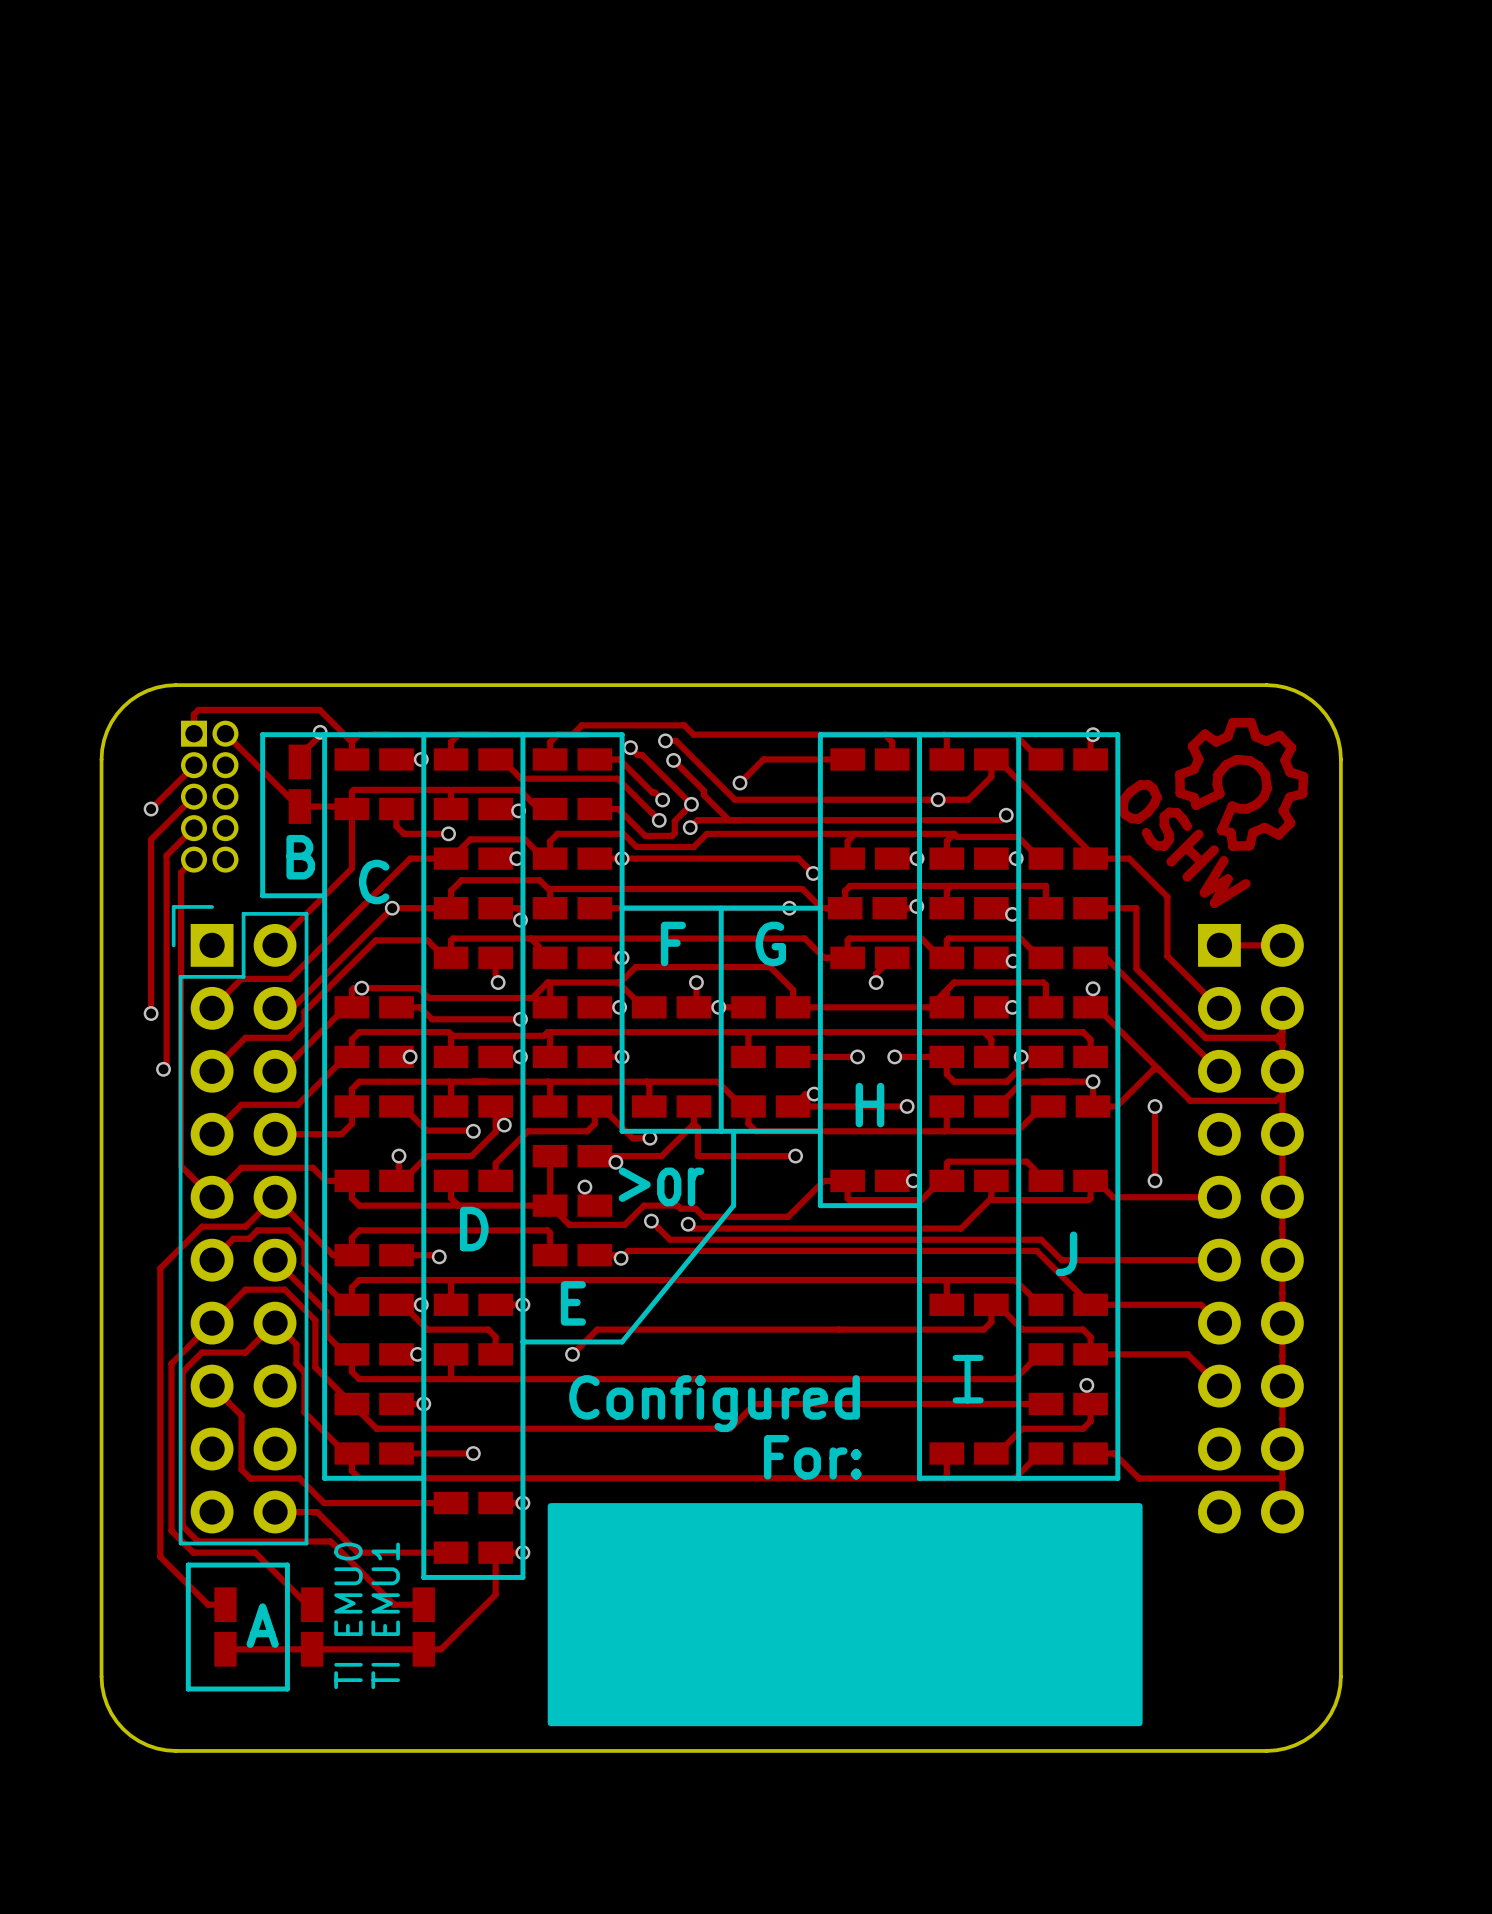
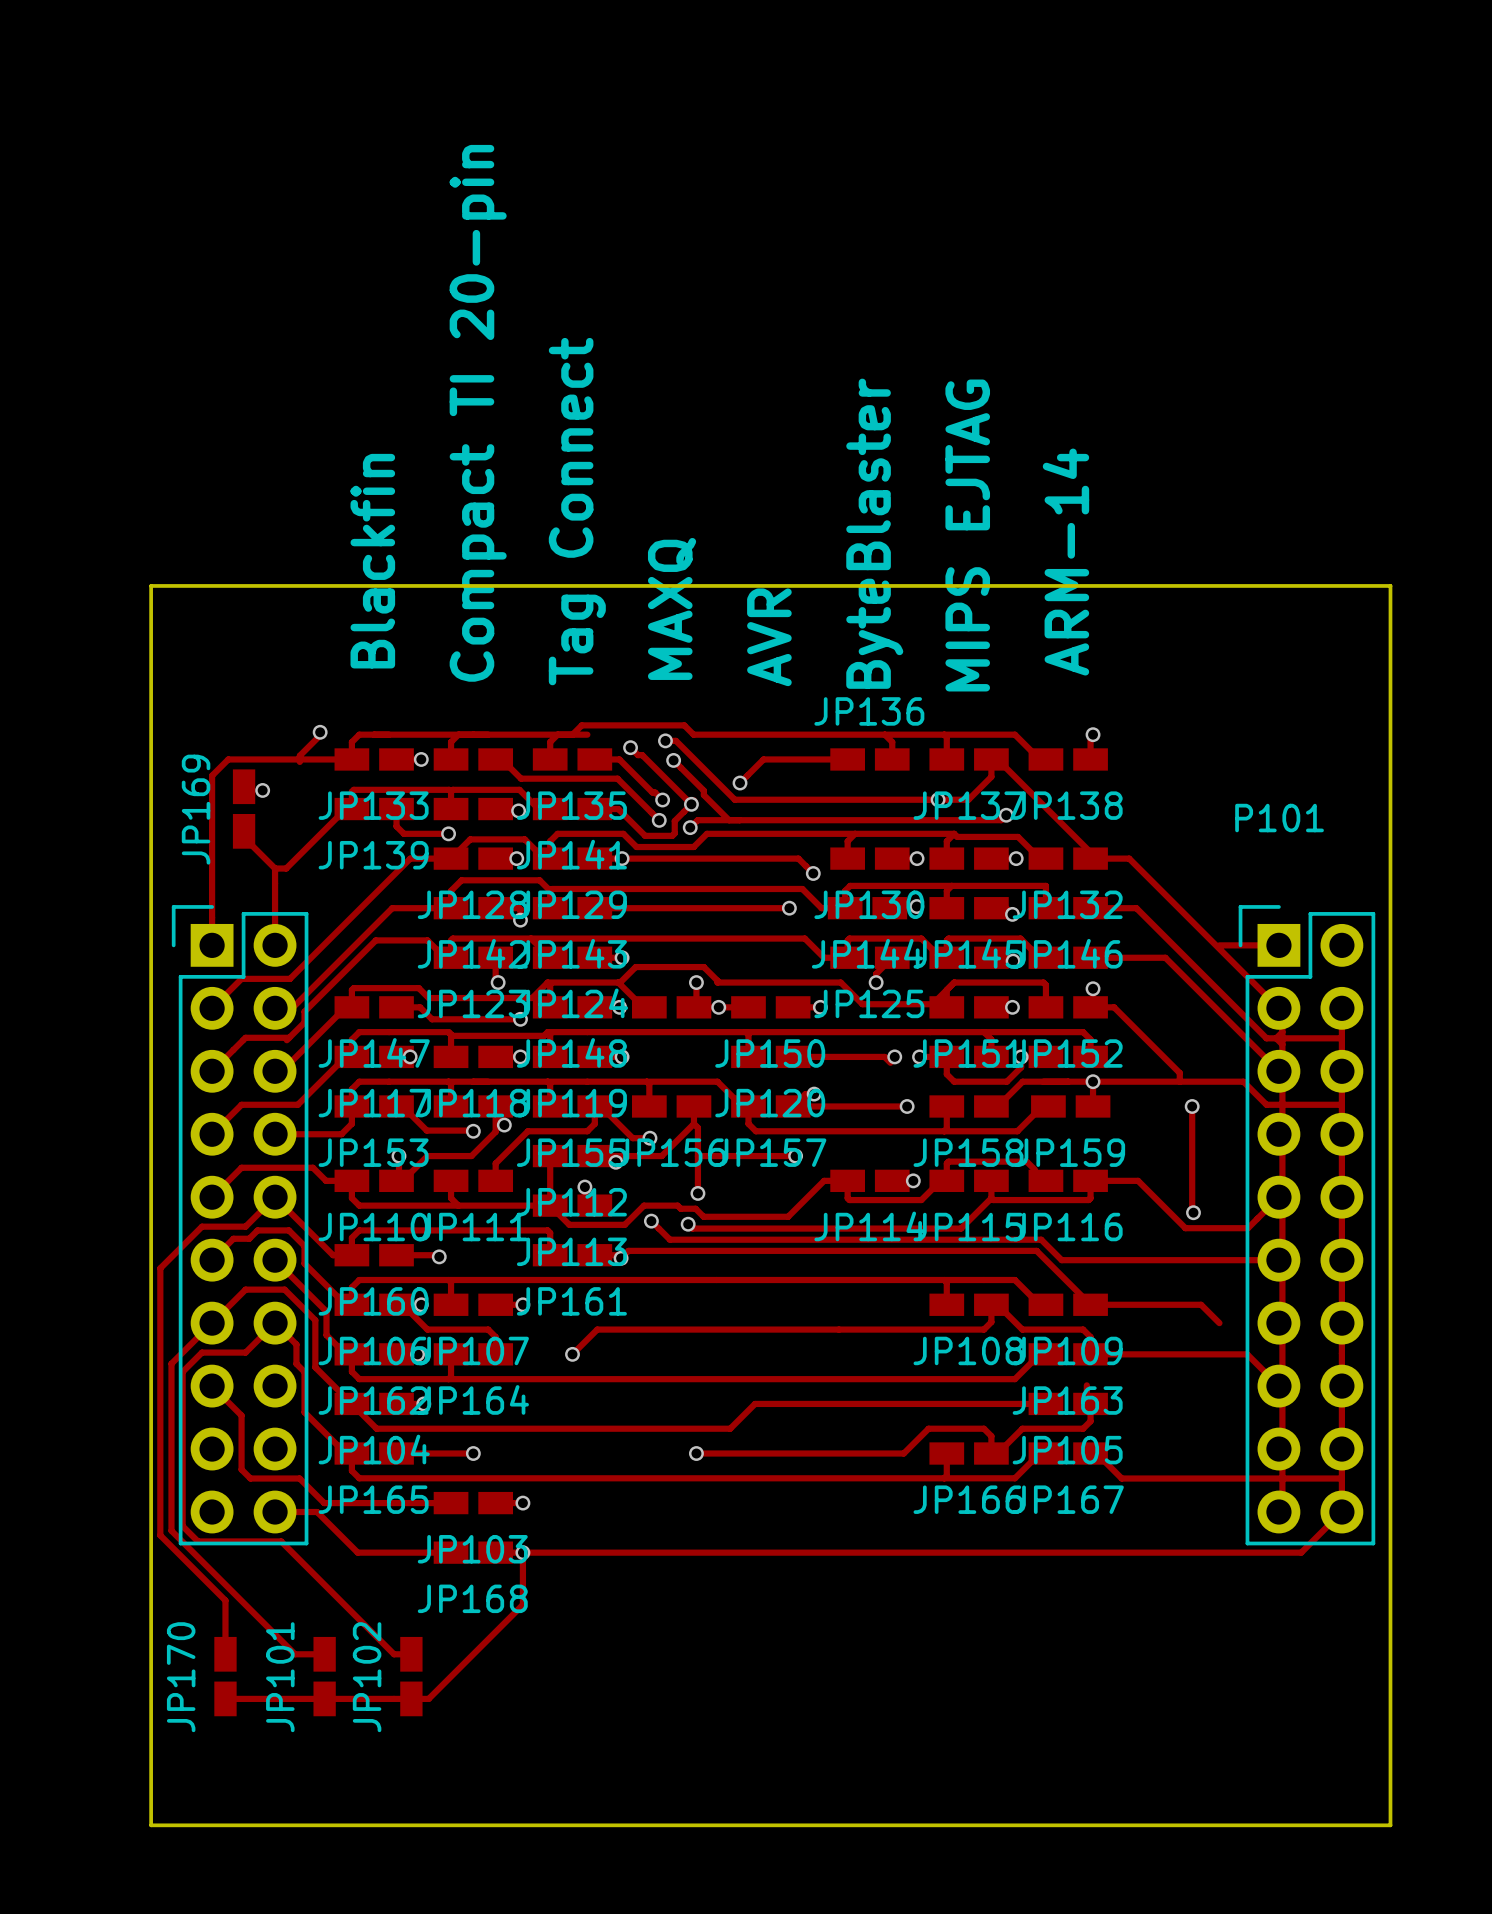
text: none -> Compact TI 20-pin (478, 413)
text: none -> Tag Connect (577, 511)
text: none -> ByteBlaster (874, 533)
text: none -> MIPS EJTAG (967, 535)
text: none -> Blackfin (372, 561)
text: none -> ARM-14 (1065, 562)
text: none -> MAXQ (672, 608)
text: none -> AVR (769, 637)
board edge: (175, 685) (1266, 685) (1295, 690) (1319, 706) (1335, 731) (1340, 759) (1340, 1676) (1335, 1705) (1319, 1729) (1295, 1745) (1266, 1750) (175, 1750) (147, 1745) (123, 1729) (107, 1705) (101, 1676) (101, 759) (107, 731) (123, 706) (147, 690) (175, 685) -> (151, 585) (151, 1825) (1390, 1825) (1390, 585) (151, 585)
JP136 name: none -> JP136 (869, 711)
drawing: [1117, 717, 1309, 908] -> none
track: (194, 733) (194, 714) (198, 709) (319, 709) (351, 742) -> none
track: (225, 733) (298, 806) (349, 806) (351, 809) (351, 868) (275, 945) -> (275, 868) (275, 945)
line: (324, 734) (324, 1478) (423, 1478) -> none
line: (423, 734) (423, 1577) (522, 1577) (522, 734) -> none
line: (919, 734) (919, 1478) (1117, 1478) (1117, 734) (820, 734) (820, 1205) (919, 1205) -> none
line: (1018, 734) (1018, 1478) -> none
track: none -> (345, 759) (228, 759) (212, 775) (212, 945)
track: (194, 765) (151, 809) -> none
part: (299, 784) -> none
via: none -> (262, 790)
track: (194, 796) (151, 839) (151, 1013) -> none
part: (209, 796) -> none
JP133 name: none -> JP133 (373, 805)
JP135 name: none -> JP135 (571, 805)
JP137 name: none -> JP137 (969, 805)
JP138 name: none -> JP138 (1067, 805)
via: (151, 809) -> none
JP169: none -> (244, 809)
track: none -> (345, 809) (286, 868) (275, 868)
track: (194, 828) (166, 855) (166, 1068) -> none
track: none -> (244, 831) (244, 837) (275, 868)
JP141 name: none -> JP141 (571, 854)
JP139 name: none -> JP139 (373, 855)
text: B (300, 857) -> none
track: (194, 859) (180, 872) (180, 1166) (212, 1197) -> none
text: C (374, 882) -> none
line: (324, 895) (262, 895) (262, 734) (622, 734) (622, 1131) (820, 1131) -> none
track: (1167, 896) (1167, 956) (1219, 1008) -> (1167, 896) (1278, 1008)
JP128 name: none -> JP128 (472, 904)
JP129 name: none -> JP129 (571, 904)
JP130 name: none -> JP130 (869, 904)
JP132 name: none -> JP132 (1067, 904)
via: (392, 908) -> none
line: (622, 908) (820, 908) -> none
line: (721, 908) (721, 1131) -> none
track: (1136, 908) (1136, 968) (1205, 1037) (1276, 1037) -> (1136, 908) (1266, 1038) (1341, 1038)
text: F (673, 943) -> none
text: G (770, 943) -> none
JP142 name: none -> JP142 (472, 953)
JP143 name: none -> JP143 (571, 953)
JP144 name: none -> JP144 (867, 953)
JP145 name: none -> JP145 (968, 953)
JP146 name: none -> JP146 (1067, 953)
track: (1105, 957) (1219, 1071) -> (1105, 957) (1165, 957) (1278, 1071)
track: (703, 967) (770, 967) (793, 989) (793, 1007) -> (703, 967) (717, 982) (840, 982) (862, 1004) (932, 1004)
via: (361, 988) -> none
JP123 name: none -> JP123 (472, 1003)
JP124 name: none -> JP124 (572, 1003)
JP125 name: none -> JP125 (869, 1003)
track: (820, 1007) (946, 1007) -> none
via: none -> (820, 1007)
track: (1096, 1007) (1190, 1100) (1275, 1100) (1282, 1094) -> (1096, 1007) (1114, 1007) (1179, 1073) (1179, 1081)
track: none -> (1341, 1008) (1341, 1512) (1301, 1552) (522, 1552) (522, 1604) (428, 1698) (225, 1698)
via: (151, 1013) -> none
JP147 name: none -> JP147 (374, 1052)
JP148 name: none -> JP148 (571, 1052)
JP150 name: none -> JP150 (770, 1053)
JP151 name: none -> JP151 (968, 1053)
JP152 name: none -> JP152 (1067, 1053)
track: none -> (857, 1056) (884, 1056) (890, 1062)
via: (857, 1056) -> none
track: (894, 1056) (919, 1056) -> none
via: none -> (919, 1056)
via: (163, 1069) -> none
track: (1158, 1069) (1153, 1069) (1116, 1106) (1093, 1106) -> none
track: none -> (1093, 1081) (1243, 1081) (1266, 1104) (1340, 1104) (1341, 1106)
JP117 name: none -> JP117 (374, 1103)
JP118 name: none -> JP118 (472, 1103)
JP119 name: none -> JP119 (571, 1103)
JP120 name: none -> JP120 (770, 1103)
text: H (869, 1105) -> none
track: (1155, 1106) (1155, 1180) -> none
via position: (1155, 1106) -> (1192, 1106)
track: none -> (1192, 1106) (1193, 1212)
line: (733, 1131) (733, 1205) (622, 1341) (522, 1341) -> none
JP153 name: none -> JP153 (373, 1152)
JP155 name: none -> JP155 (571, 1152)
JP156 name: none -> JP156 (671, 1152)
JP157 name: none -> JP157 (770, 1152)
JP158 name: none -> JP158 (968, 1152)
JP159 name: none -> JP159 (1070, 1152)
track: none -> (697, 1156) (697, 1193)
track: (1096, 1180) (1113, 1197) (1219, 1197) -> (1096, 1180) (1138, 1180) (1185, 1228) (1247, 1228) (1278, 1197)
via: (1155, 1180) -> none
text: >or (661, 1186) -> none
via: none -> (697, 1193)
JP112 name: none -> JP112 (571, 1202)
via: none -> (1193, 1212)
P101: none -> (1306, 1225)
JP114 name: none -> JP114 (869, 1226)
JP110 name: none -> JP110 (373, 1227)
JP111 name: none -> JP111 (472, 1227)
JP115 name: none -> JP115 (968, 1227)
JP116 name: none -> JP116 (1067, 1227)
part: (1250, 1228) -> none
text: D (474, 1229) -> none
JP113 name: none -> JP113 (571, 1251)
text: J (1066, 1253) -> none
track: none -> (1219, 1260) (1278, 1260)
JP160 name: none -> JP160 (373, 1301)
JP161 name: none -> JP161 (571, 1301)
text: E (573, 1303) -> none
JP106 name: none -> JP106 (373, 1350)
JP107 name: none -> JP107 (473, 1350)
JP108 name: none -> JP108 (968, 1350)
JP109 name: none -> JP109 (1067, 1350)
track: (1187, 1354) (1219, 1386) -> (1187, 1354) (1247, 1354) (1278, 1386)
text: H (968, 1379) -> none
via: (1086, 1385) -> none
JP164 name: none -> JP164 (473, 1399)
JP162 name: none -> JP162 (373, 1400)
JP163 name: none -> JP163 (1067, 1400)
text: Configured (714, 1403) -> none
JP104 name: none -> JP104 (374, 1449)
JP105 name: none -> JP105 (1067, 1450)
track: none -> (696, 1453) (903, 1453) (928, 1428) (983, 1428) (991, 1436) (991, 1453)
via: none -> (696, 1453)
track: (1096, 1453) (1114, 1453) (1139, 1478) -> (1096, 1453) (1121, 1478) (1139, 1478)
text: For: (812, 1457) -> none
track: none -> (1282, 1478) (1341, 1478)
JP165 name: none -> JP165 (373, 1499)
JP166 name: none -> JP166 (968, 1499)
JP167 name: none -> JP167 (1068, 1499)
drawing: [547, 1503, 1143, 1727] -> none
track: (160, 1535) (160, 1556) (208, 1604) (225, 1604) -> (160, 1535) (225, 1600) (225, 1654)
track: (281, 1541) (330, 1541) (394, 1604) (423, 1604) -> (281, 1541) (394, 1654) (411, 1654)
JP103 name: none -> JP103 (472, 1549)
track: (193, 1552) (255, 1552) (307, 1604) -> (193, 1552) (295, 1654) (324, 1654)
track: (495, 1552) (495, 1594) (441, 1649) (225, 1649) -> none
line: (188, 1565) (188, 1688) (287, 1688) (287, 1565) (188, 1565) -> none
JP168 name: none -> JP168 (472, 1598)
text: TI EMU0 (348, 1615) -> none
text: TI EMU1 (385, 1615) -> none
text: A (262, 1625) -> none
part: (225, 1627) -> none
part: (312, 1627) -> none
part: (423, 1627) -> none
JP170: none -> (225, 1676)
JP101: none -> (324, 1676)
JP102: none -> (411, 1676)

